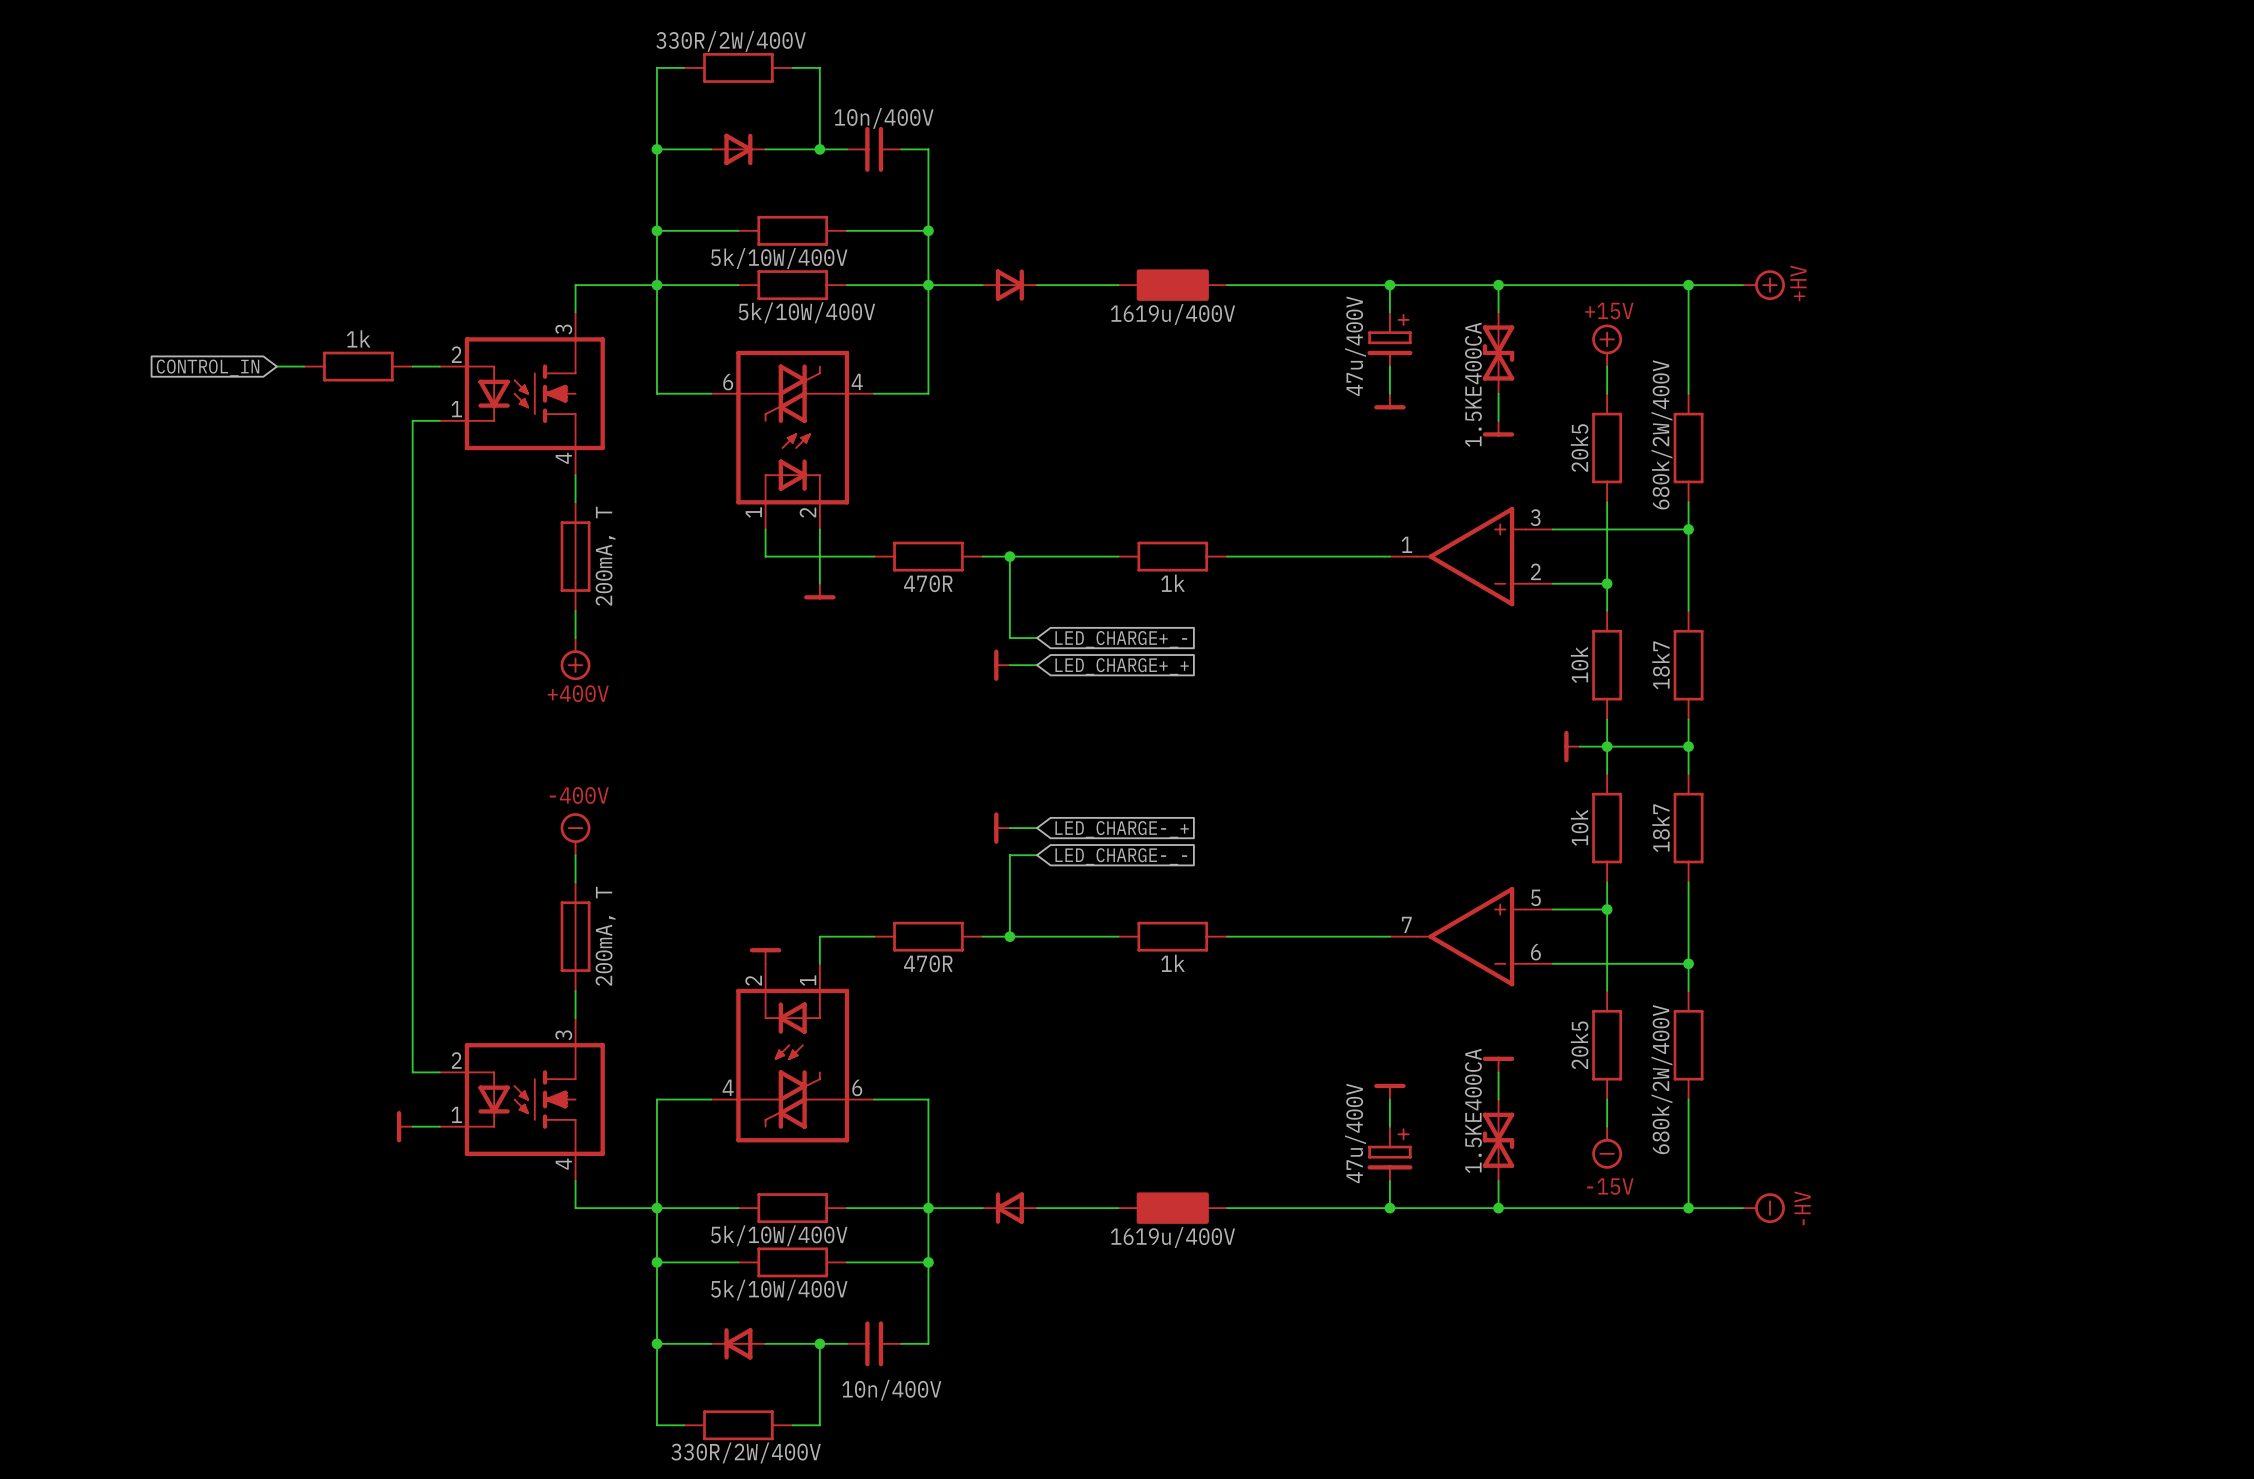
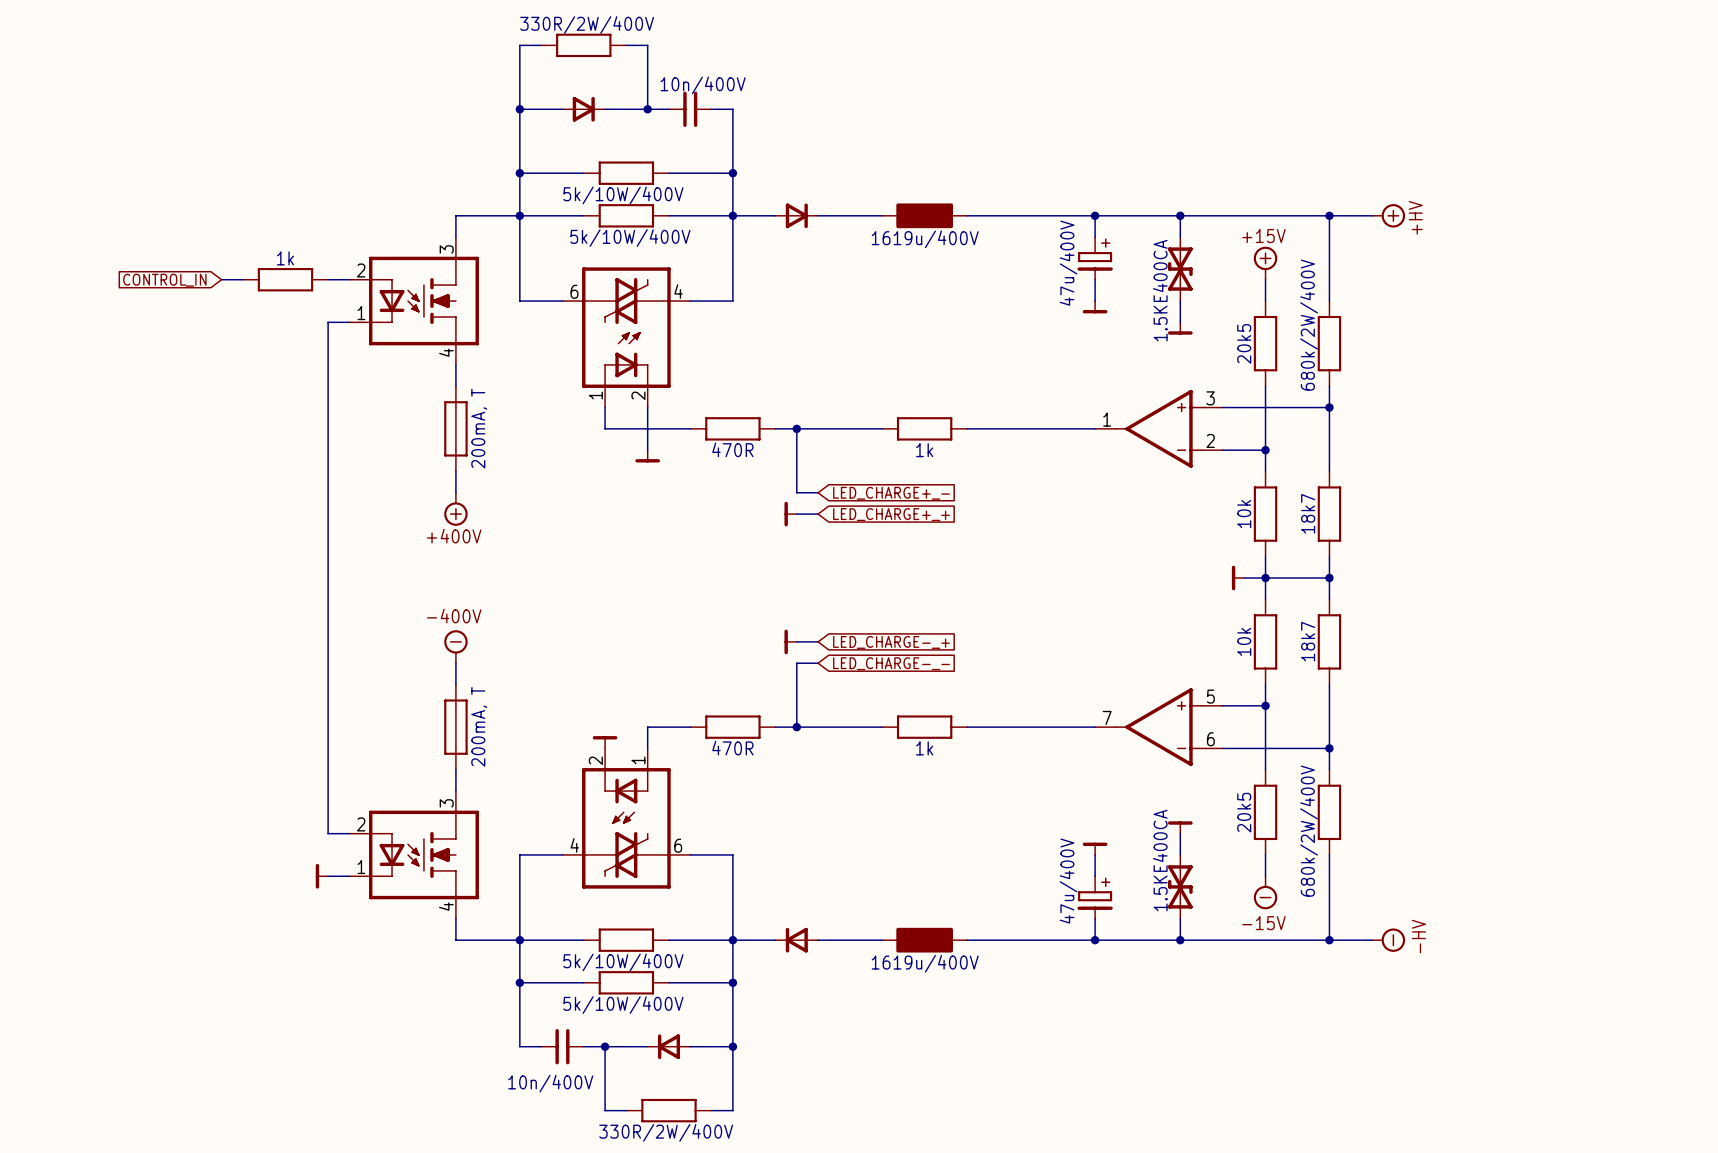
wire: (656, 1343) (656, 1425) (684, 1425) -> none
junction: (656, 1343) -> none
part position: (738, 1343) -> (668, 1046)
junction: none -> (605, 1046)
junction: (819, 1343) -> none
wire: (847, 1343) (819, 1343) (819, 1425) (792, 1425) -> (583, 1046) (605, 1046) (605, 1110) (626, 1110)
part position: (874, 1343) -> (562, 1046)
wire: none -> (732, 1046) (732, 1110) (711, 1110)
junction: none -> (732, 1046)
part value position: 10n/400V (891, 1390) -> 10n/400V (550, 1083)
part position: (738, 1425) -> (668, 1110)

